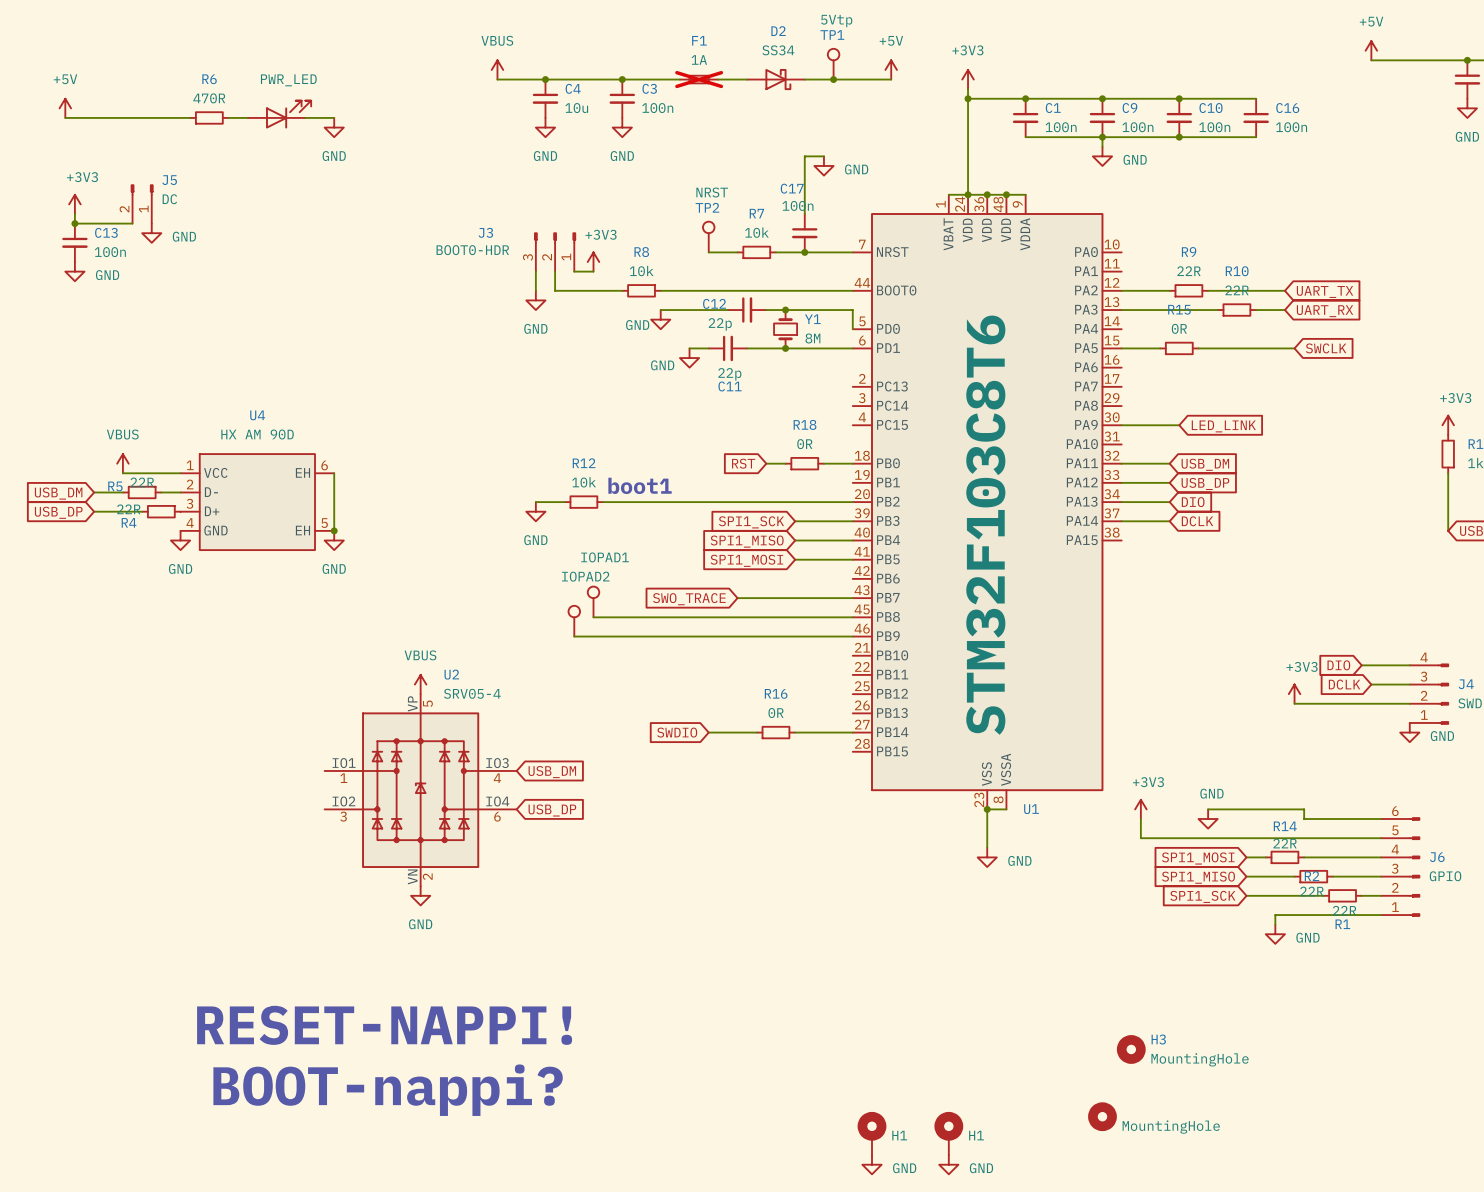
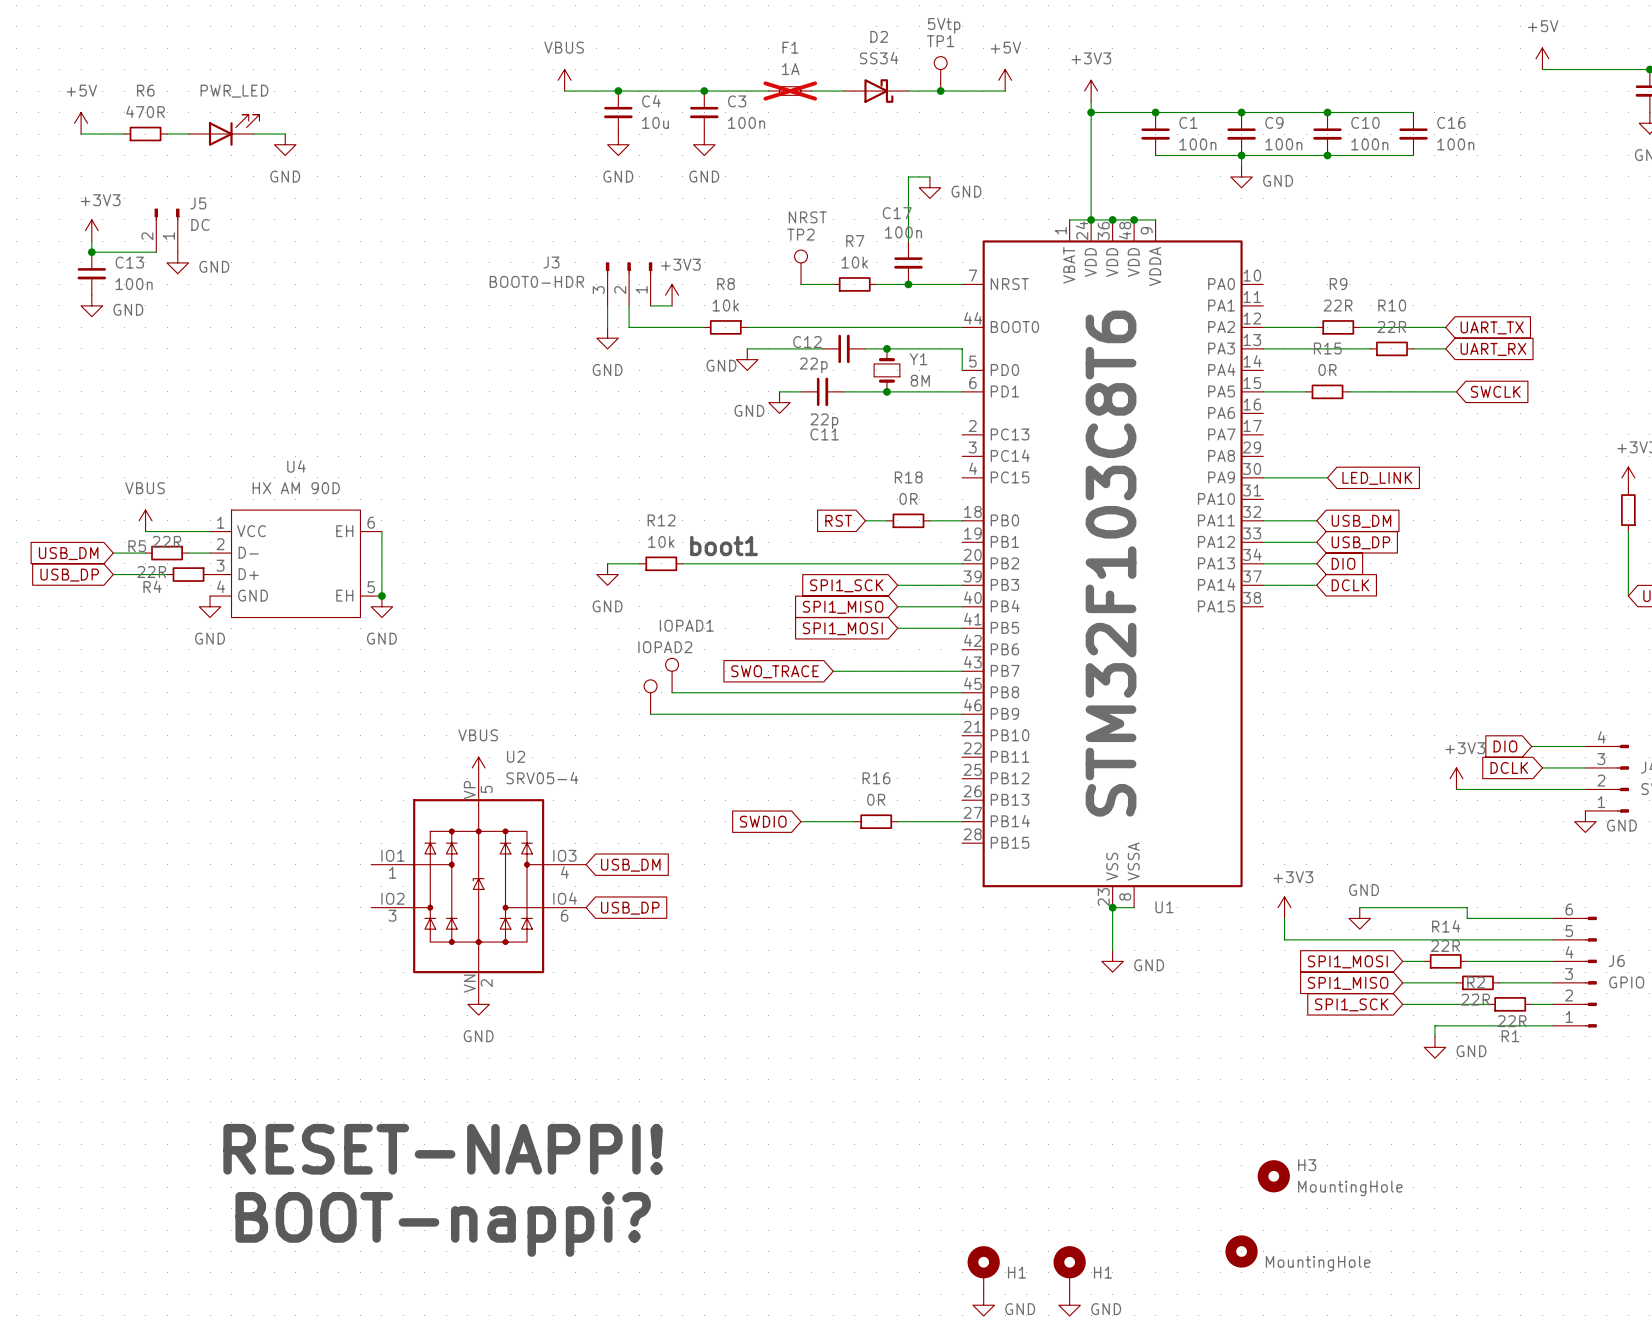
part position: (279, 114) -> (223, 130)
wire: (103, 117) (142, 117) -> none
R6 position: (209, 117) -> (145, 134)
wire: (305, 117) (334, 117) -> none
power symbol position: GND (334, 127) -> GND (285, 144)

